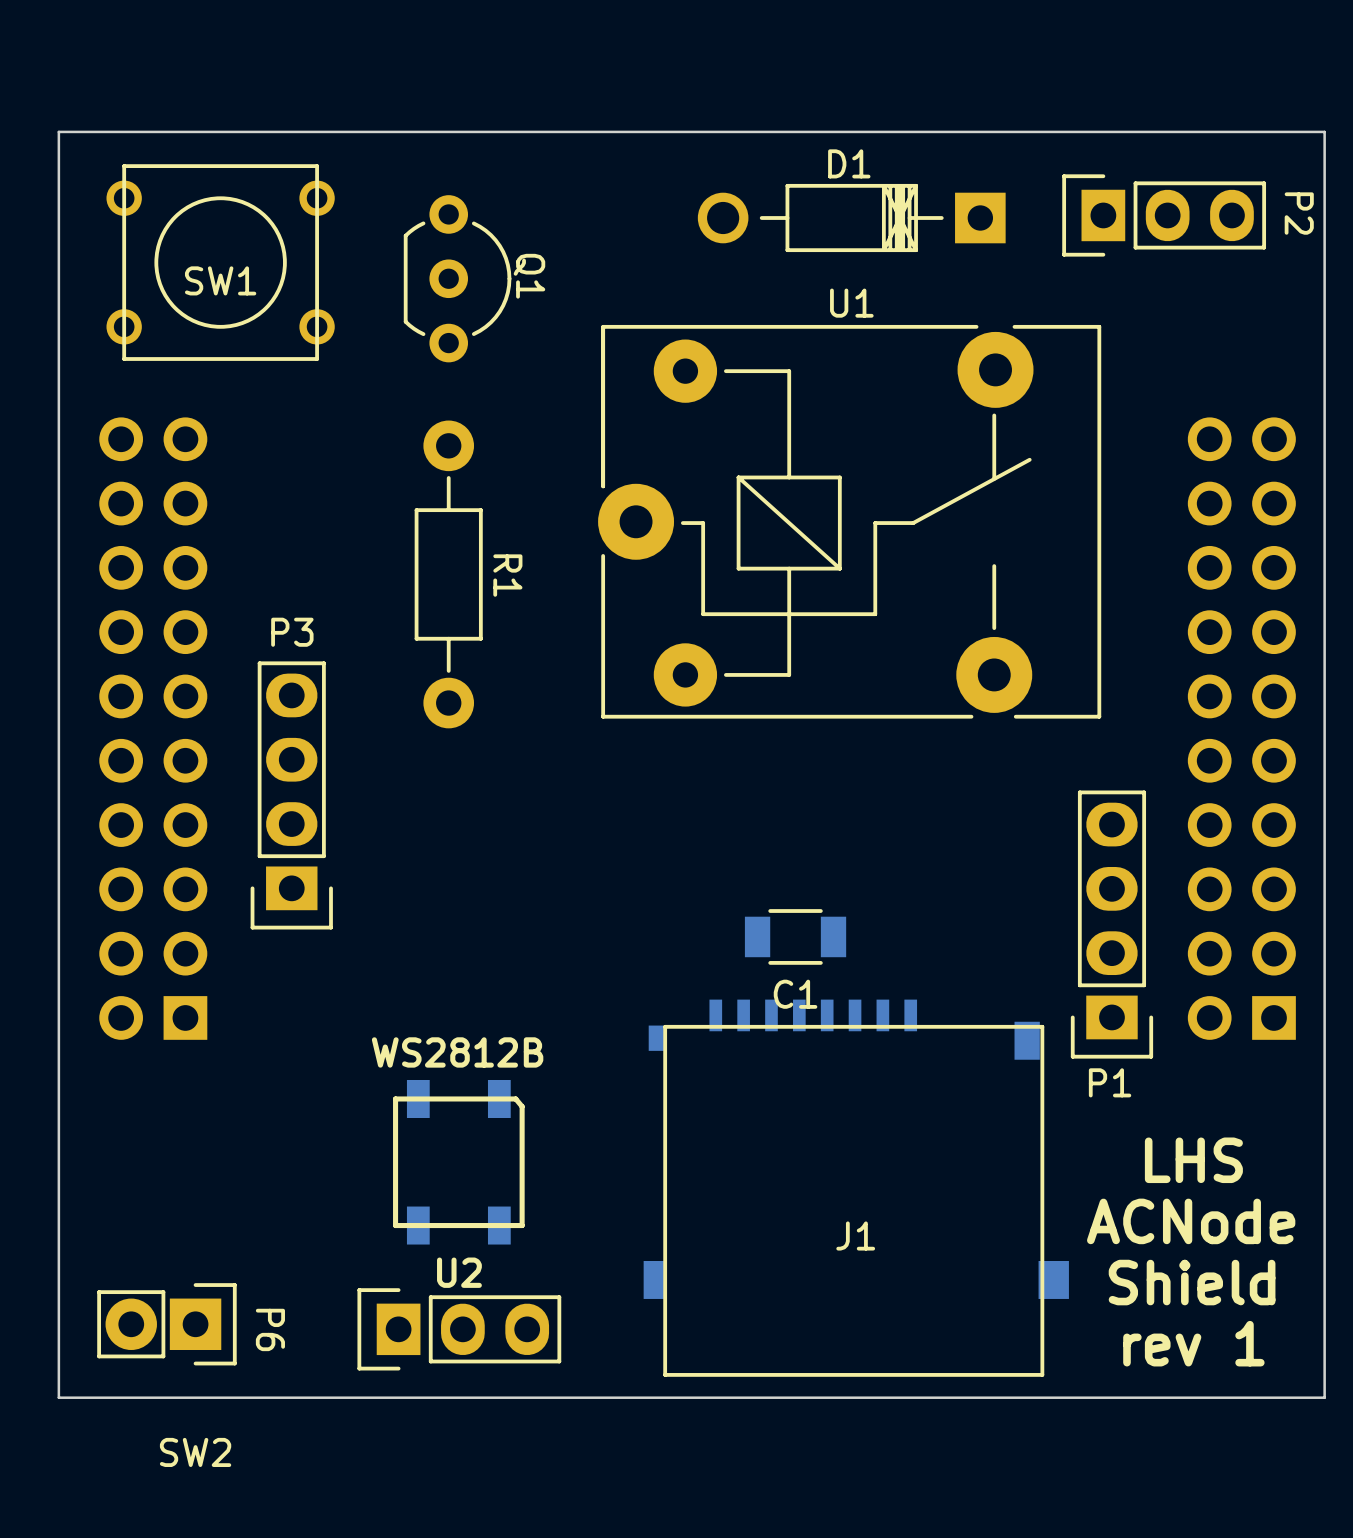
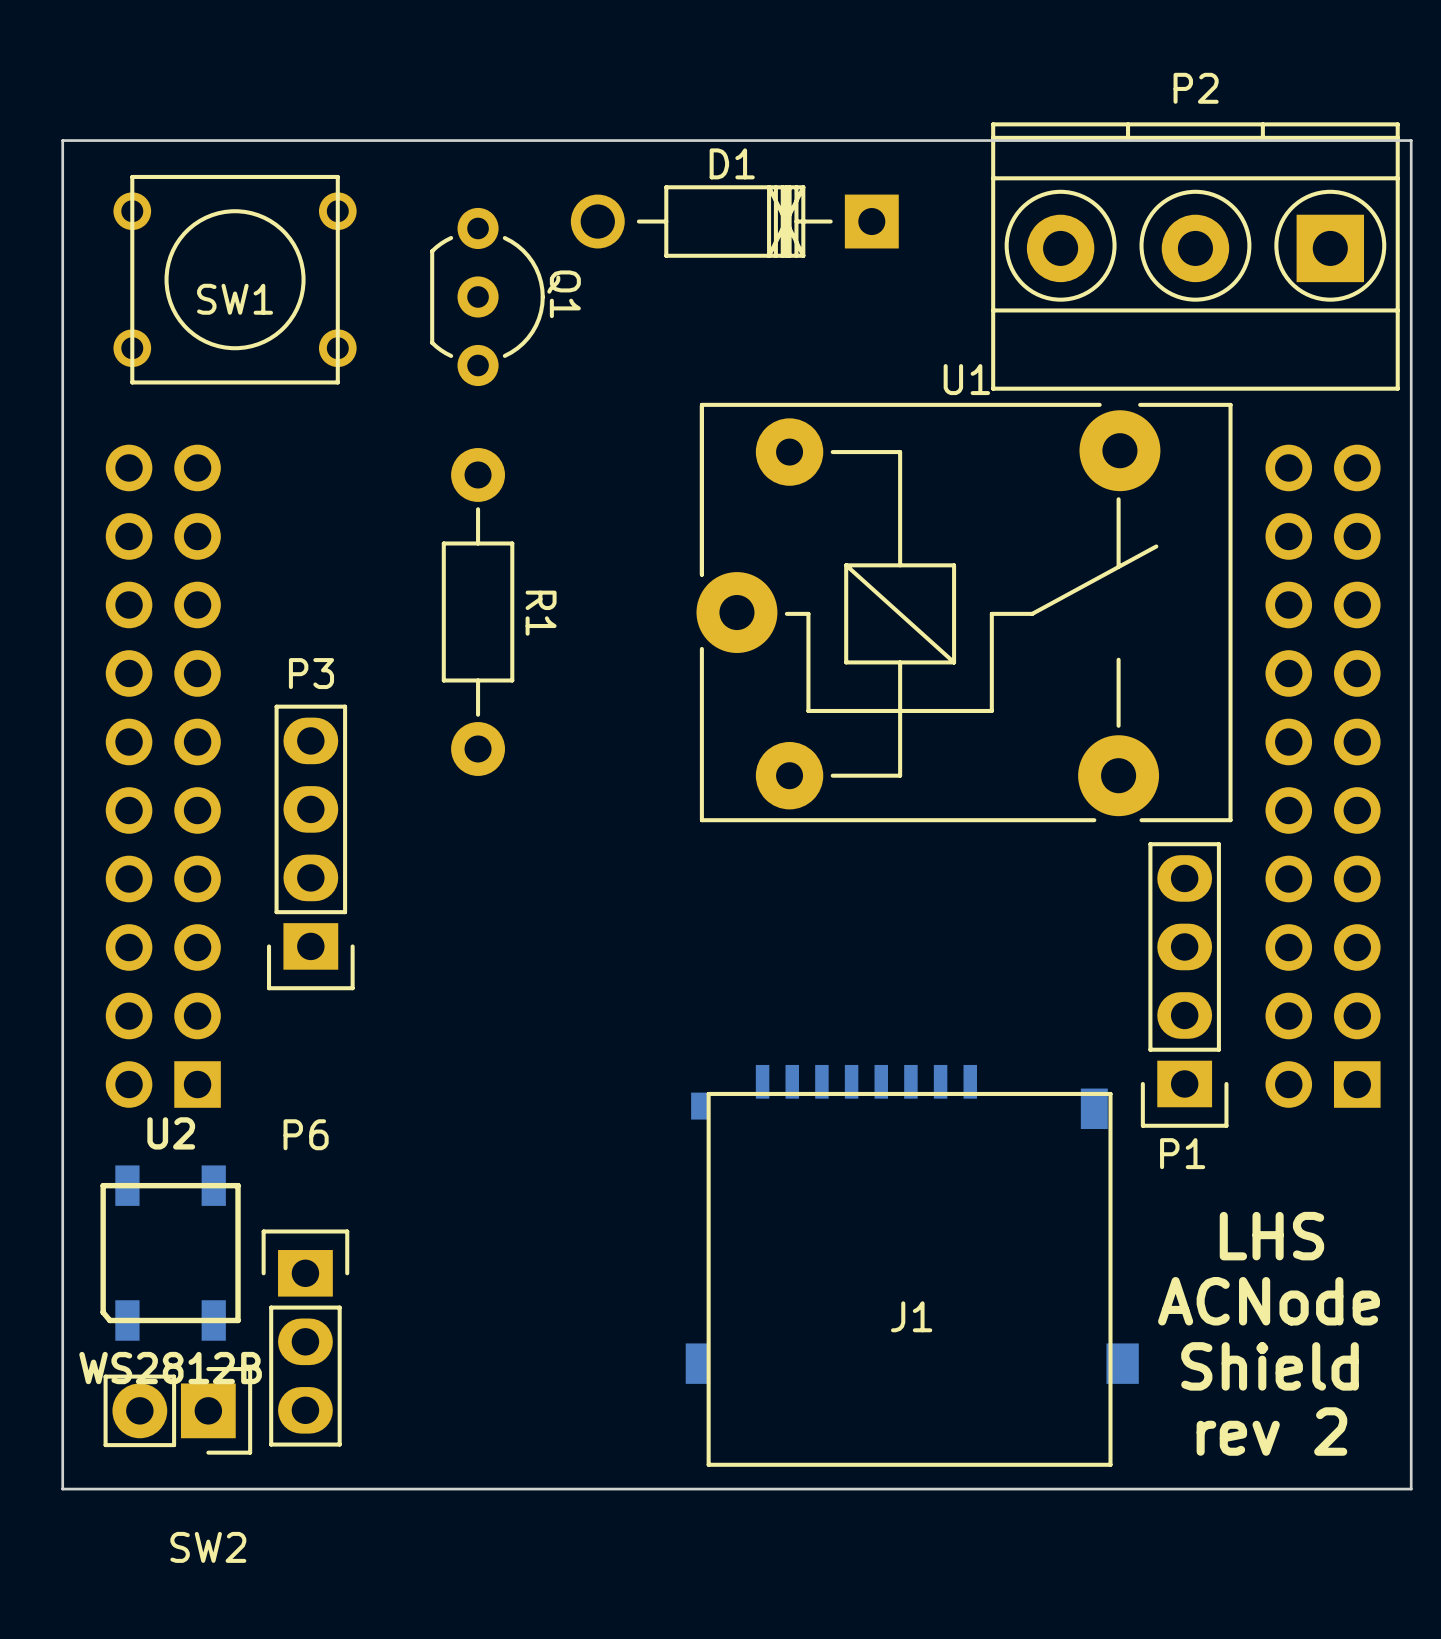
P2 footprint: [1062, 174, 1267, 257] -> [991, 122, 1400, 391]
D1 footprint: [697, 183, 1006, 253] -> [570, 185, 899, 258]
P2 name position: P2 (1299, 213) -> P2 (1196, 88)
U1 position: (849, 521) -> (964, 612)
C1: (795, 936) -> none
U2 rotation: 0° (458, 1162) -> 180° (170, 1253)
U2 position: (458, 1162) -> (170, 1253)
P6 rotation: 0° (459, 1329) -> 90° clockwise (305, 1338)
P6 position: (459, 1329) -> (305, 1338)
text: rev 1 (1193, 1343) -> rev 2 (1271, 1431)

